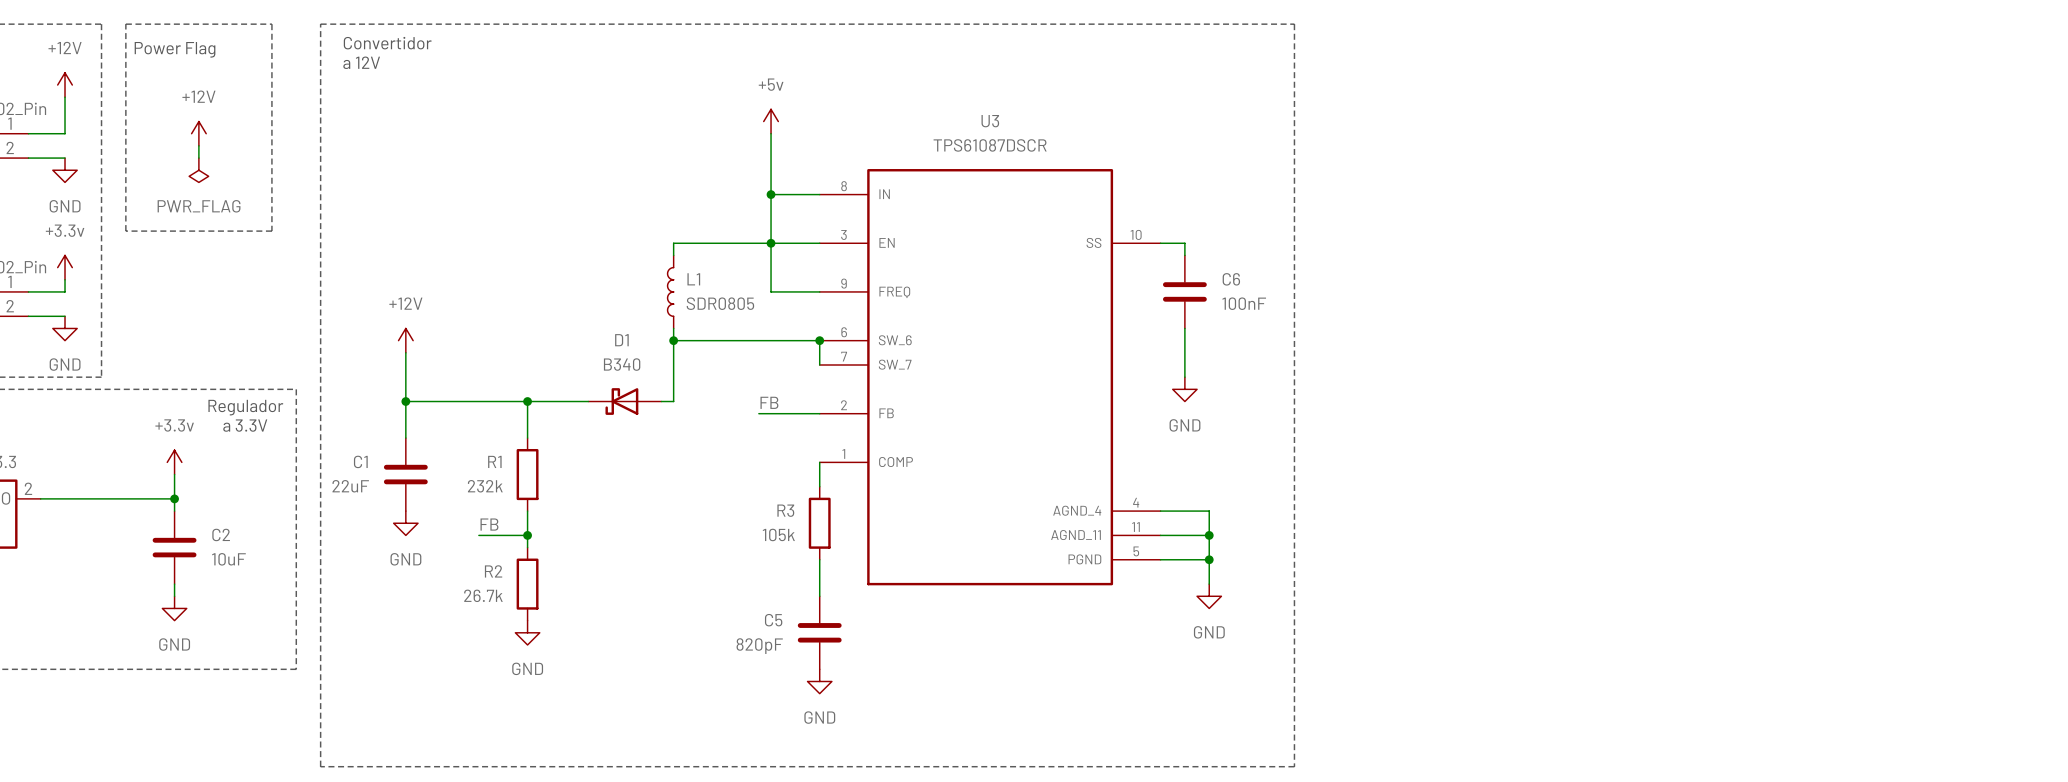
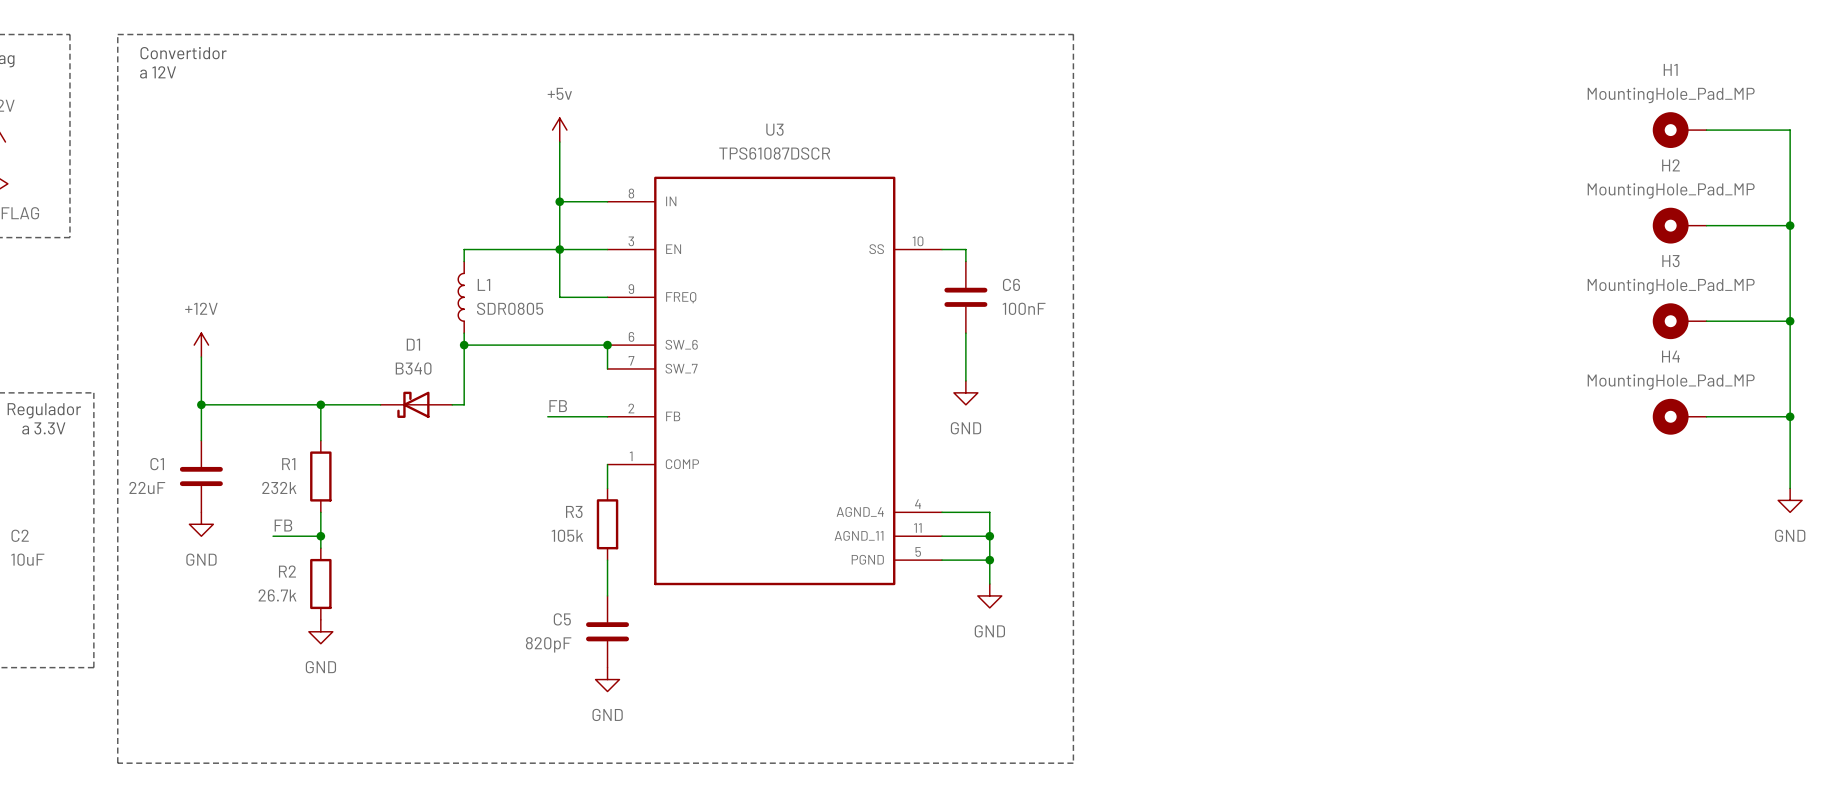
H1: none -> MountingHole_Pad_MP (1679, 130)
wire: none -> (1706, 130) (1790, 130) (1790, 488)
H2: none -> MountingHole_Pad_MP (1679, 225)
wire: none -> (1706, 225) (1790, 225)
junction: none -> (1790, 225)
H3: none -> MountingHole_Pad_MP (1679, 321)
wire: none -> (1706, 321) (1790, 321)
junction: none -> (1790, 321)
H4: none -> MountingHole_Pad_MP (1679, 416)
wire: none -> (1706, 416) (1790, 416)
junction: none -> (1790, 416)
power symbol: none -> GND (1790, 500)

